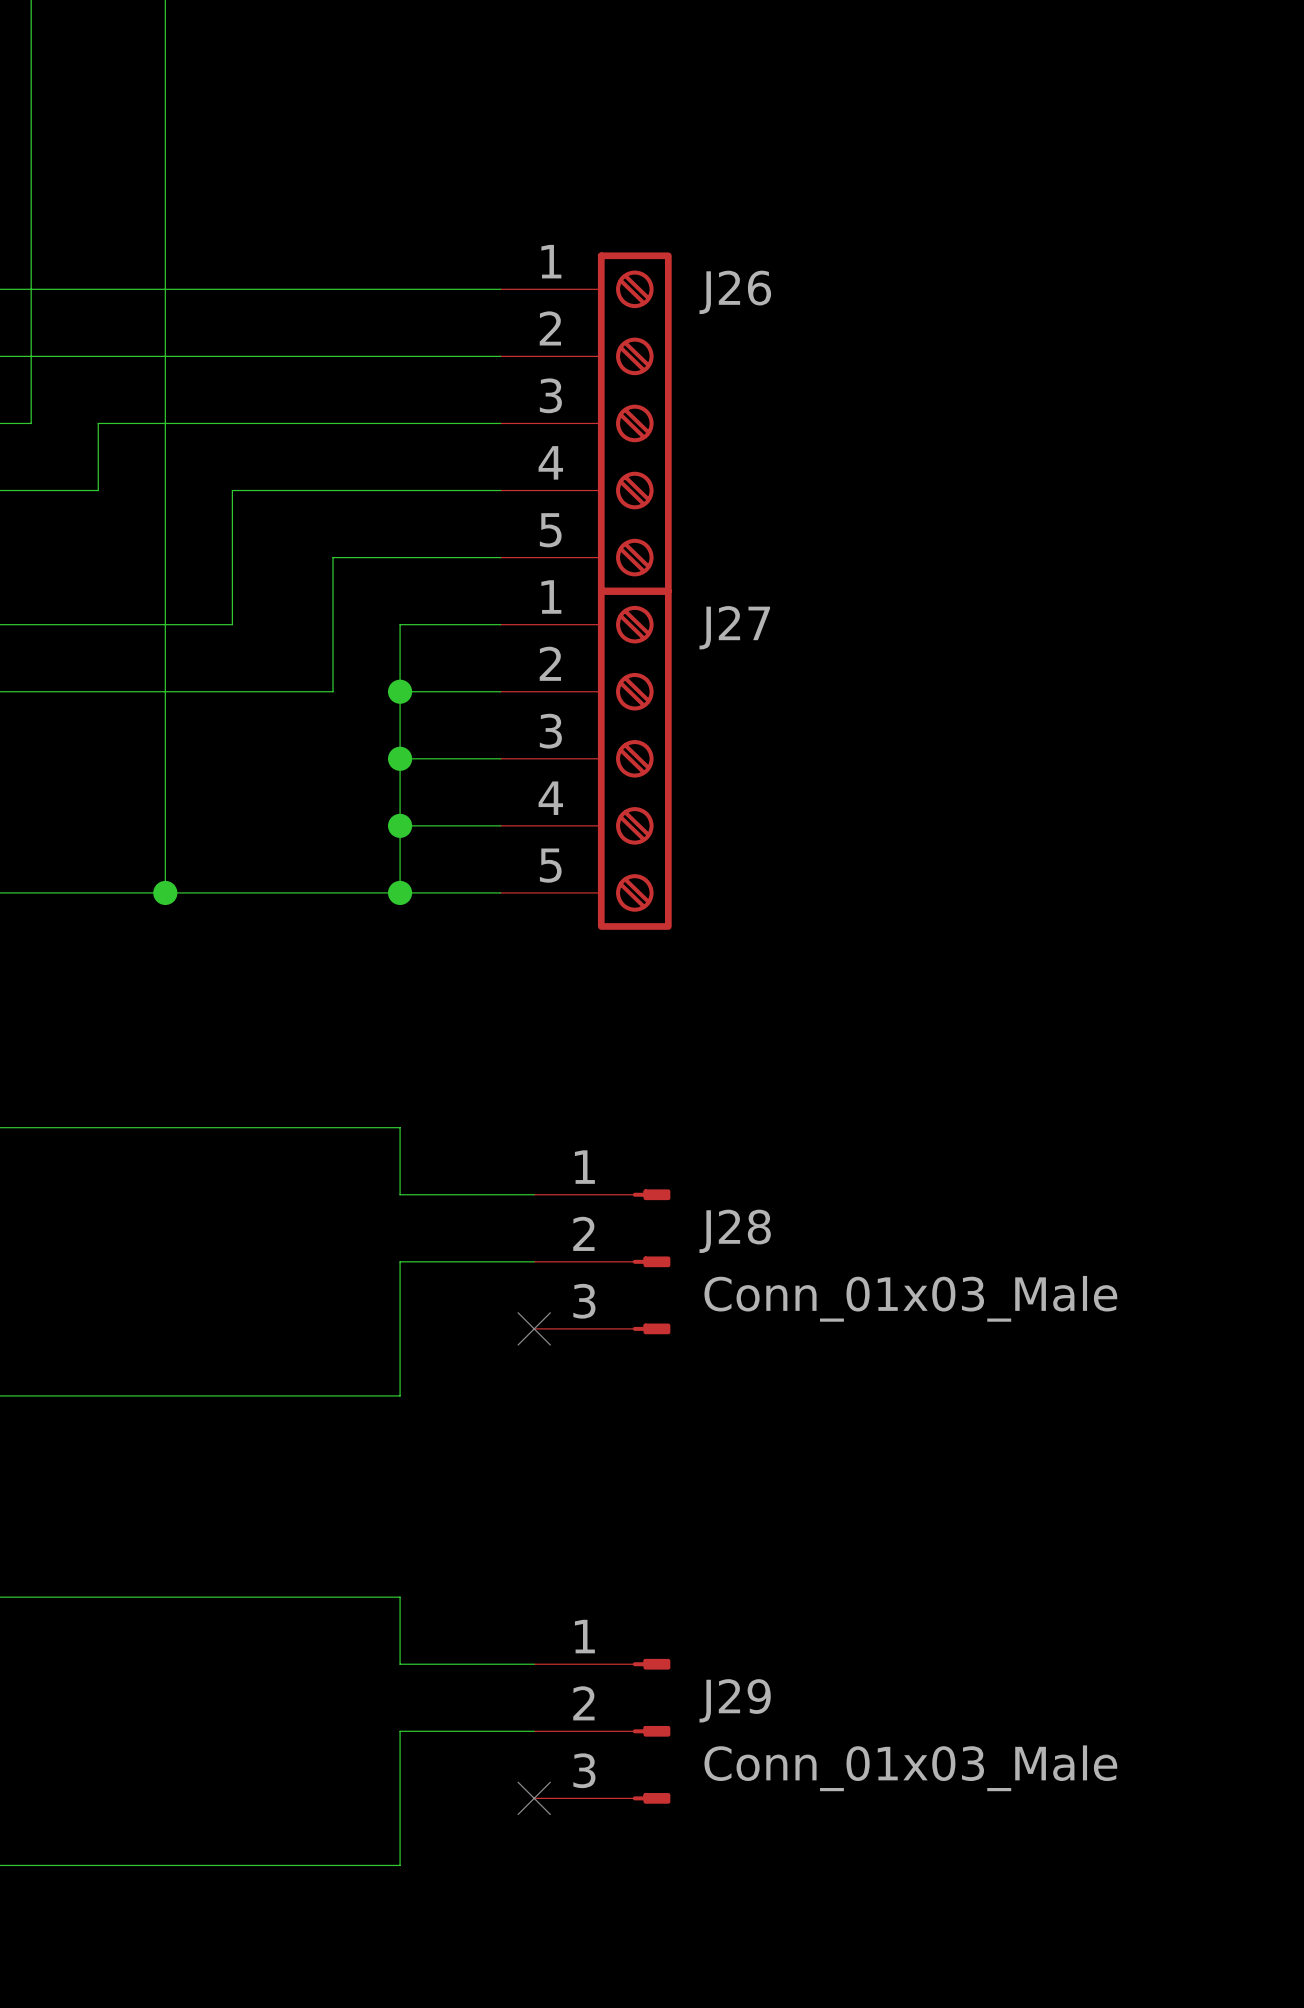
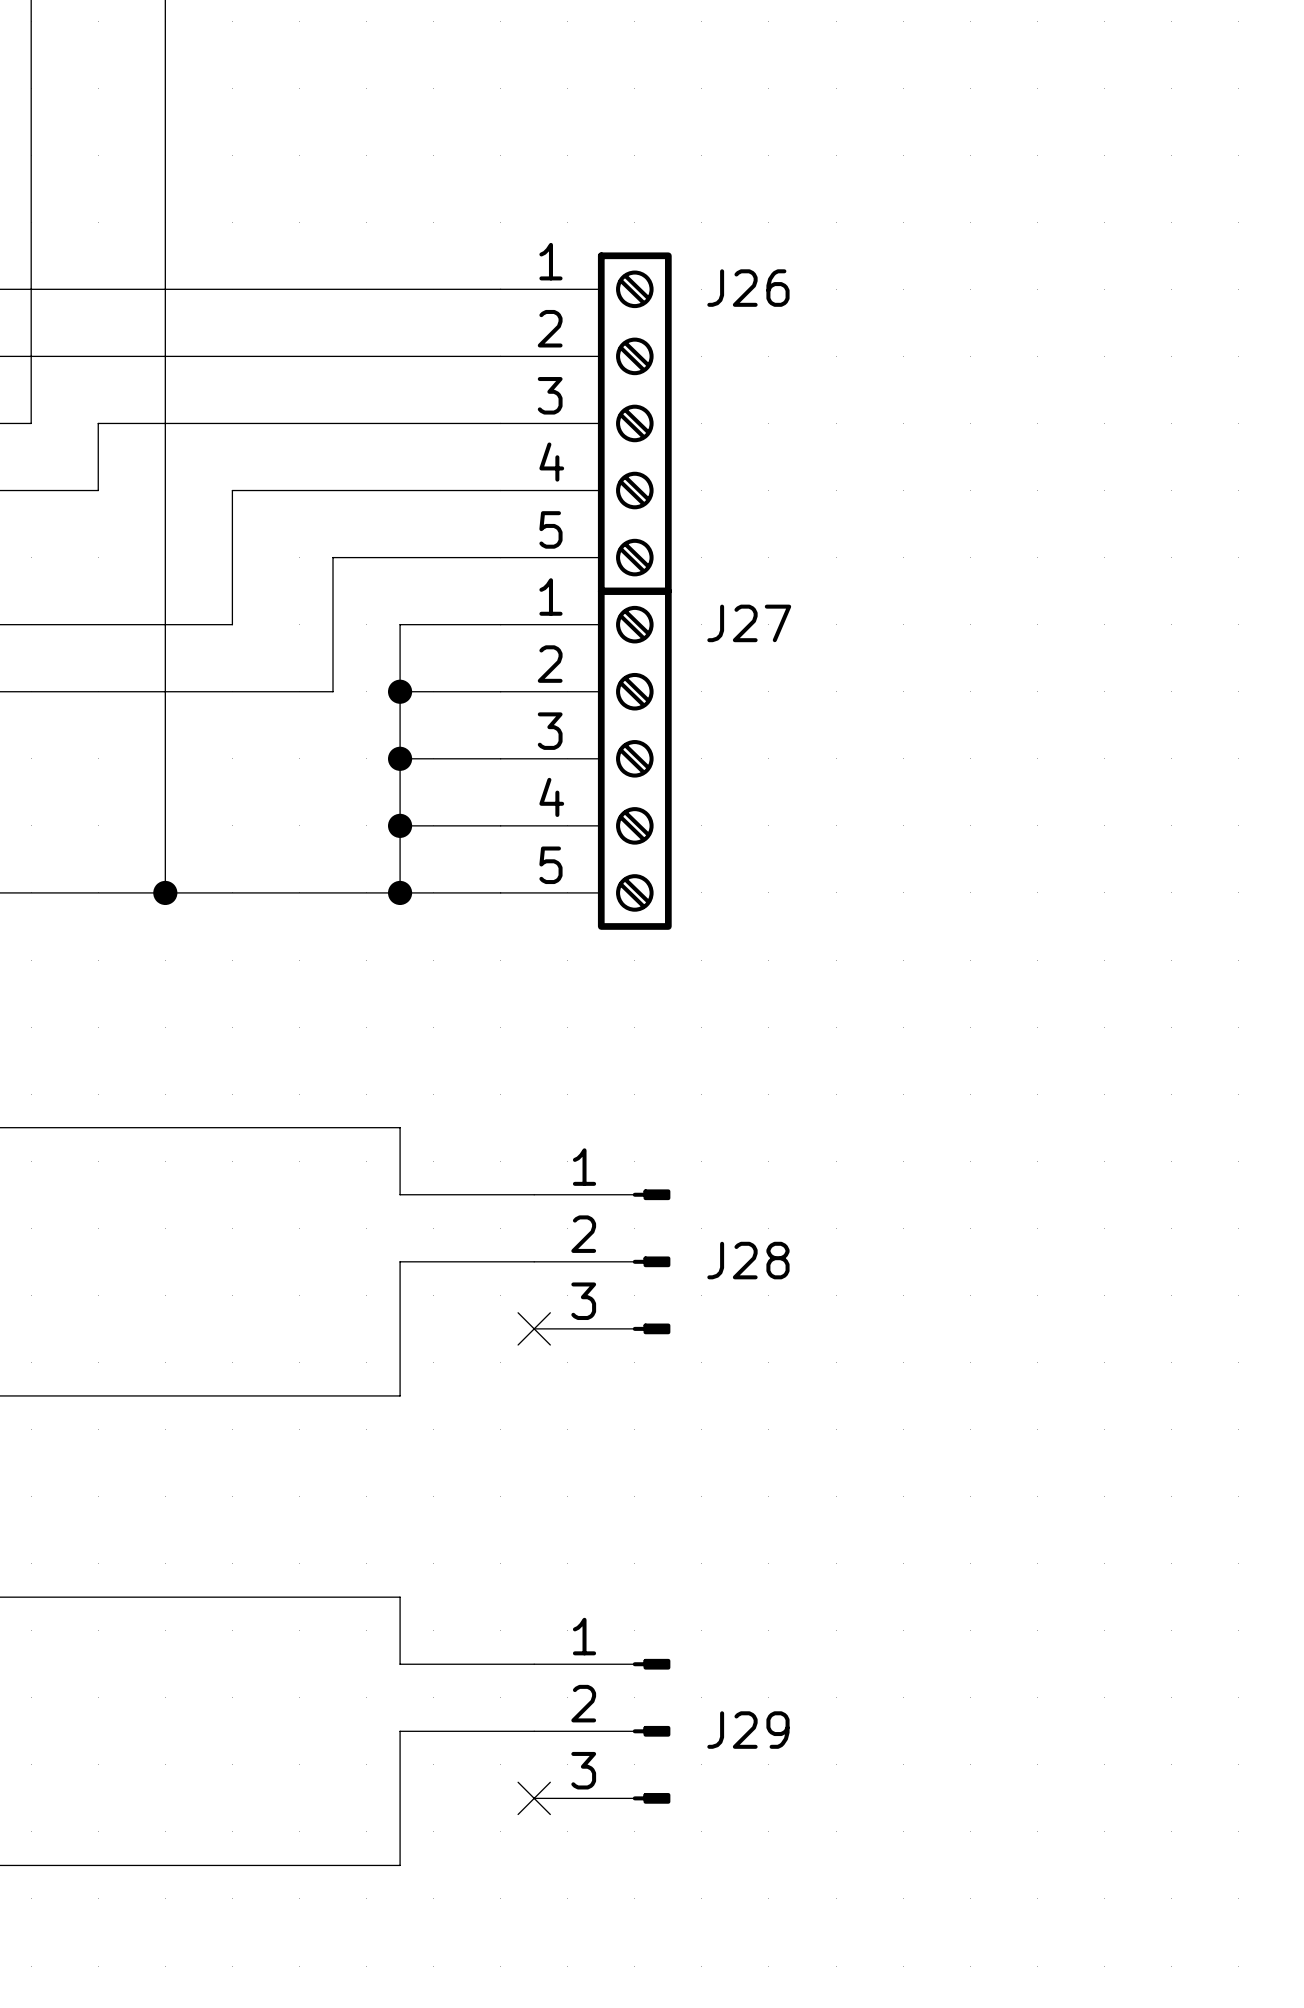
J28 name position: J28 (735, 1231) -> J28 (748, 1260)
J28 value: Conn_01x03_Male (910, 1298) -> none
J29 name position: J29 (735, 1700) -> J29 (748, 1730)
J29 value: Conn_01x03_Male (910, 1768) -> none

